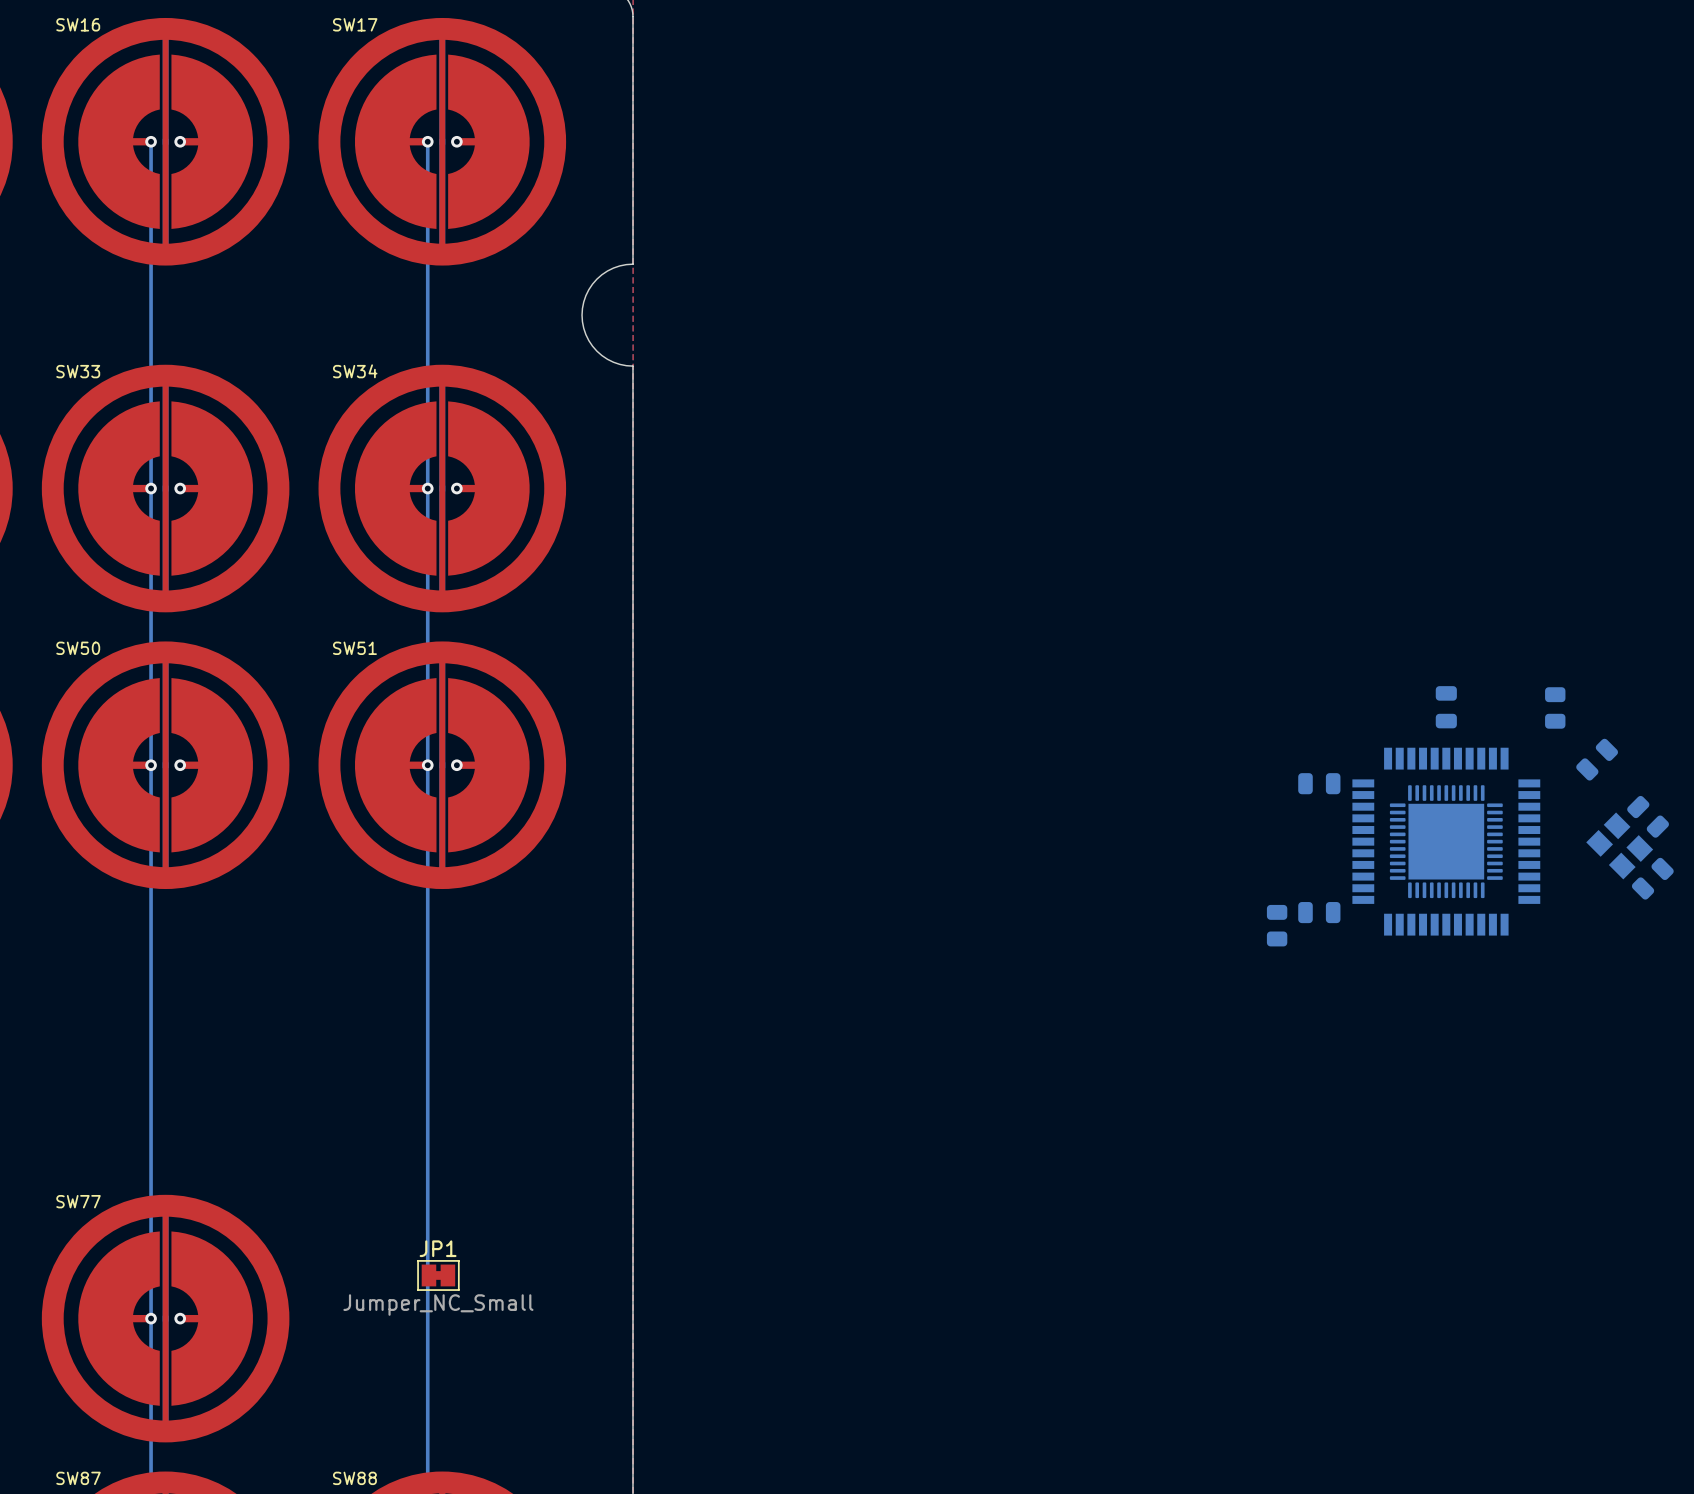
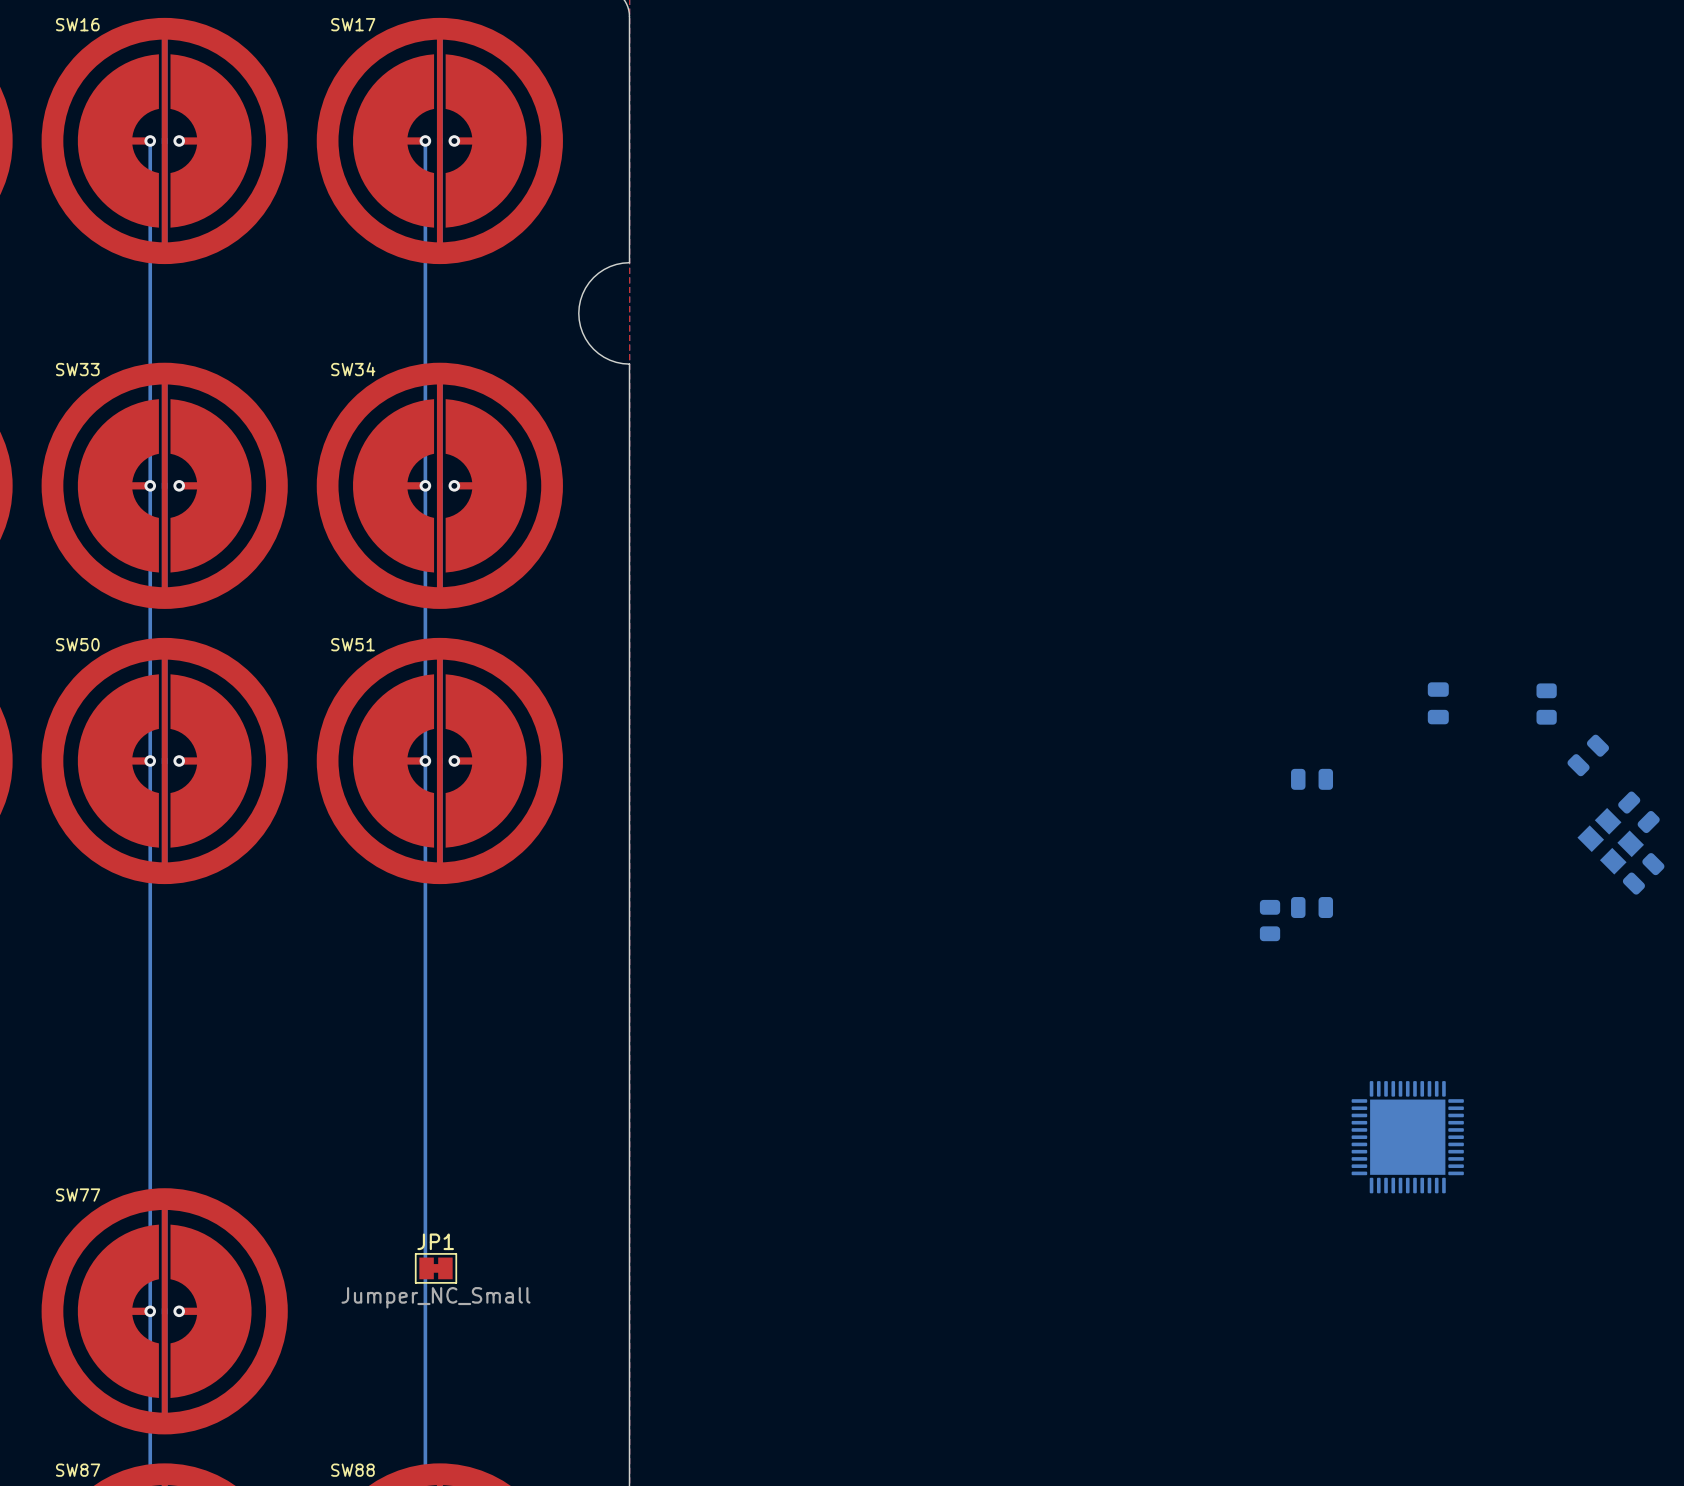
part position: (1446, 841) -> (1407, 1137)
part: (1446, 841) -> none

